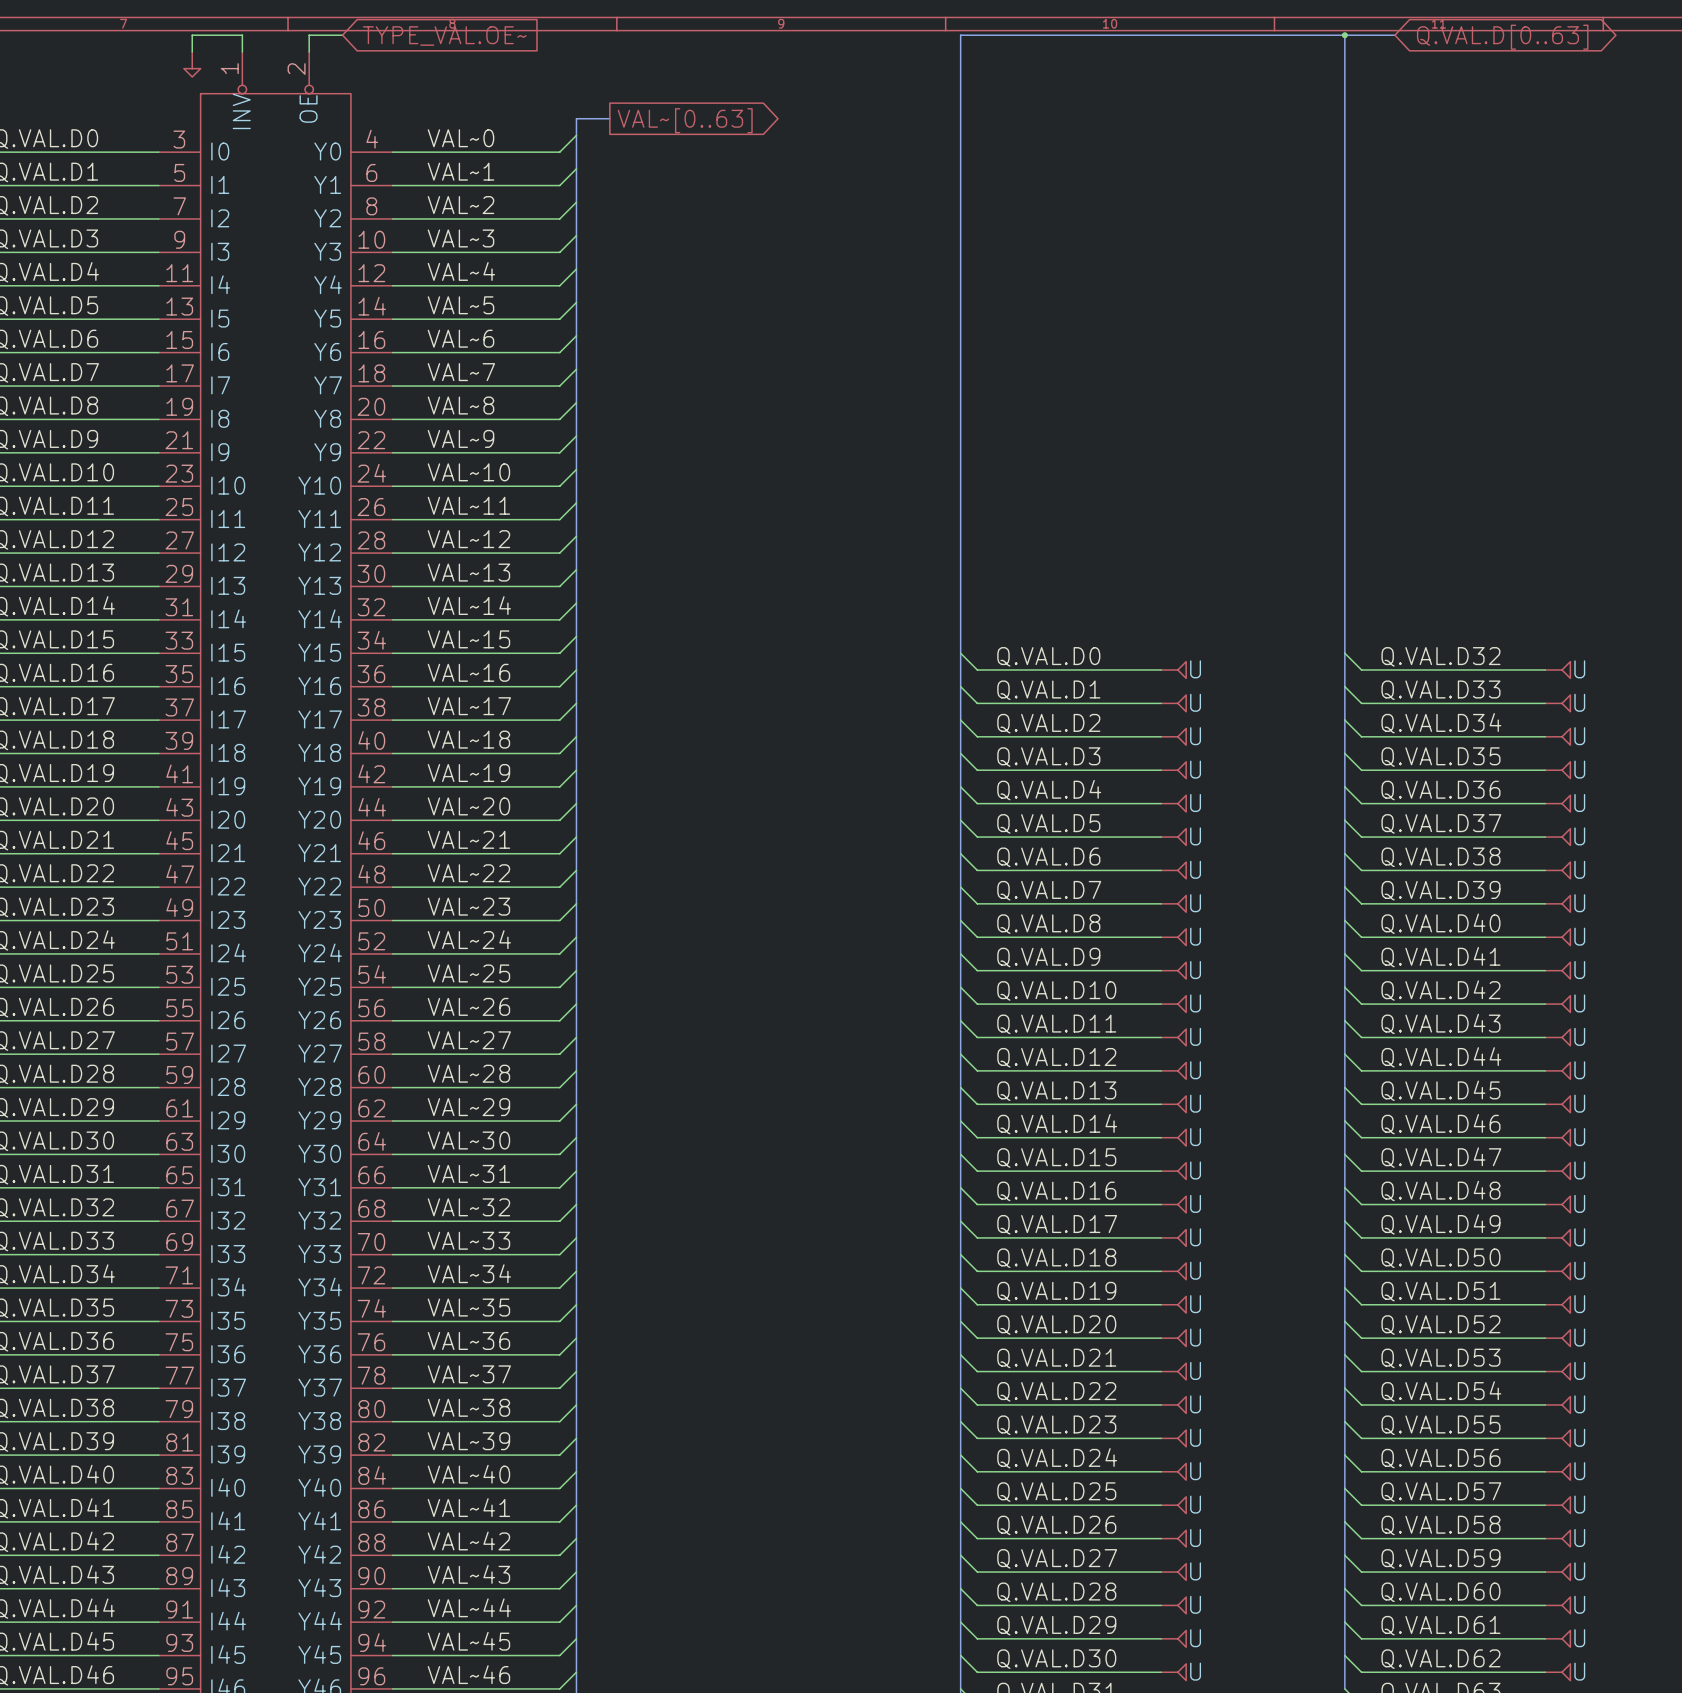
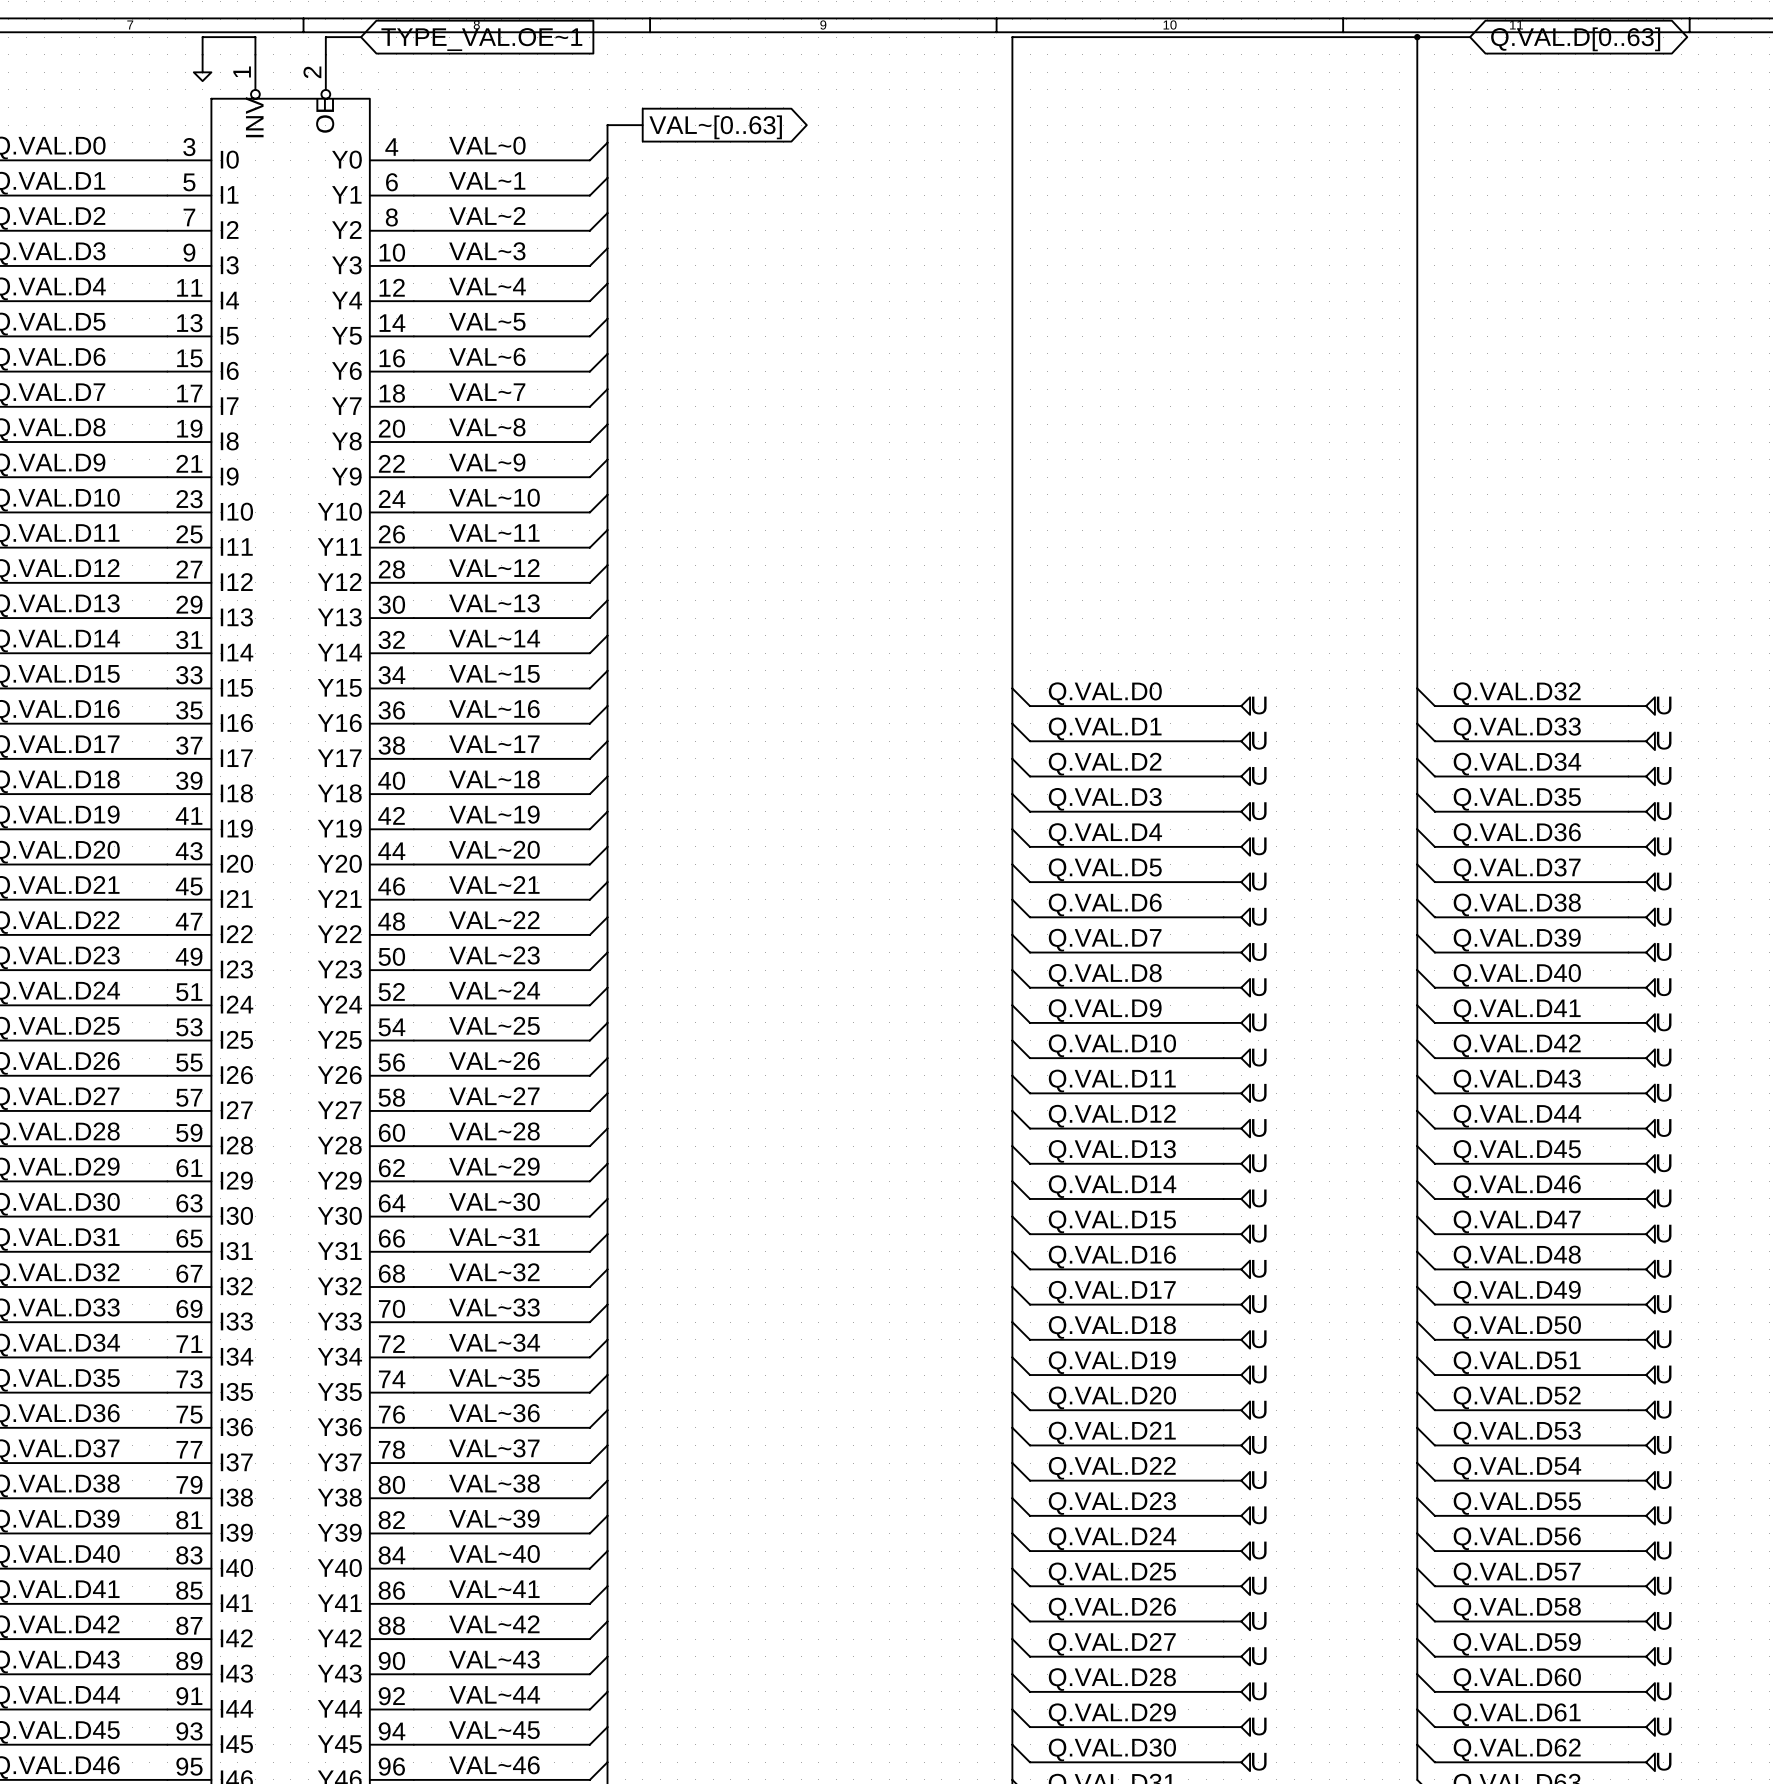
global label: TYPE_VAL.OE~ (444, 36) -> TYPE_VAL.OE~1 (481, 39)

